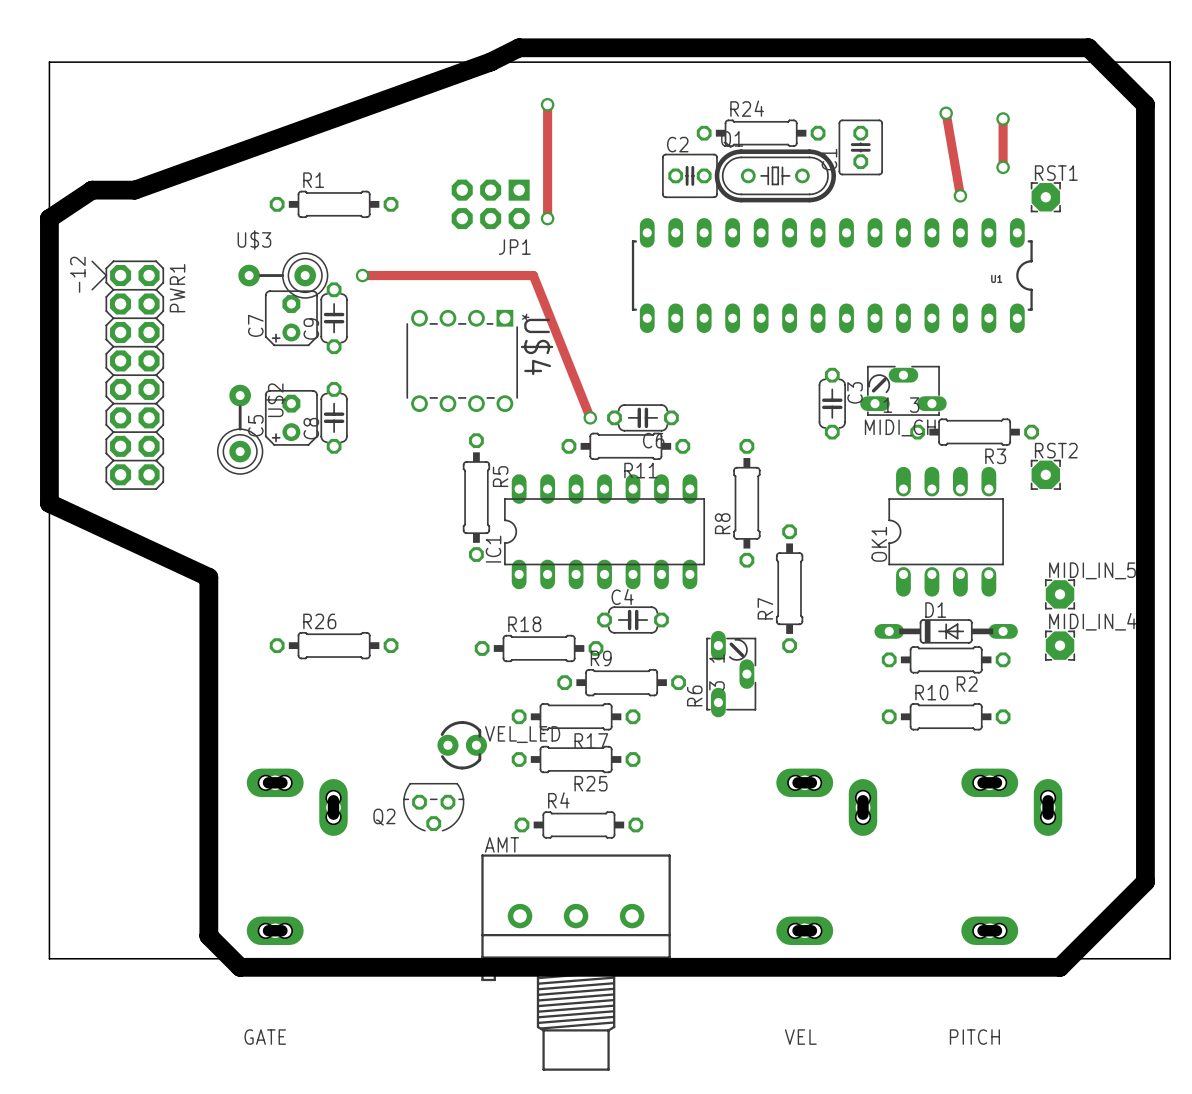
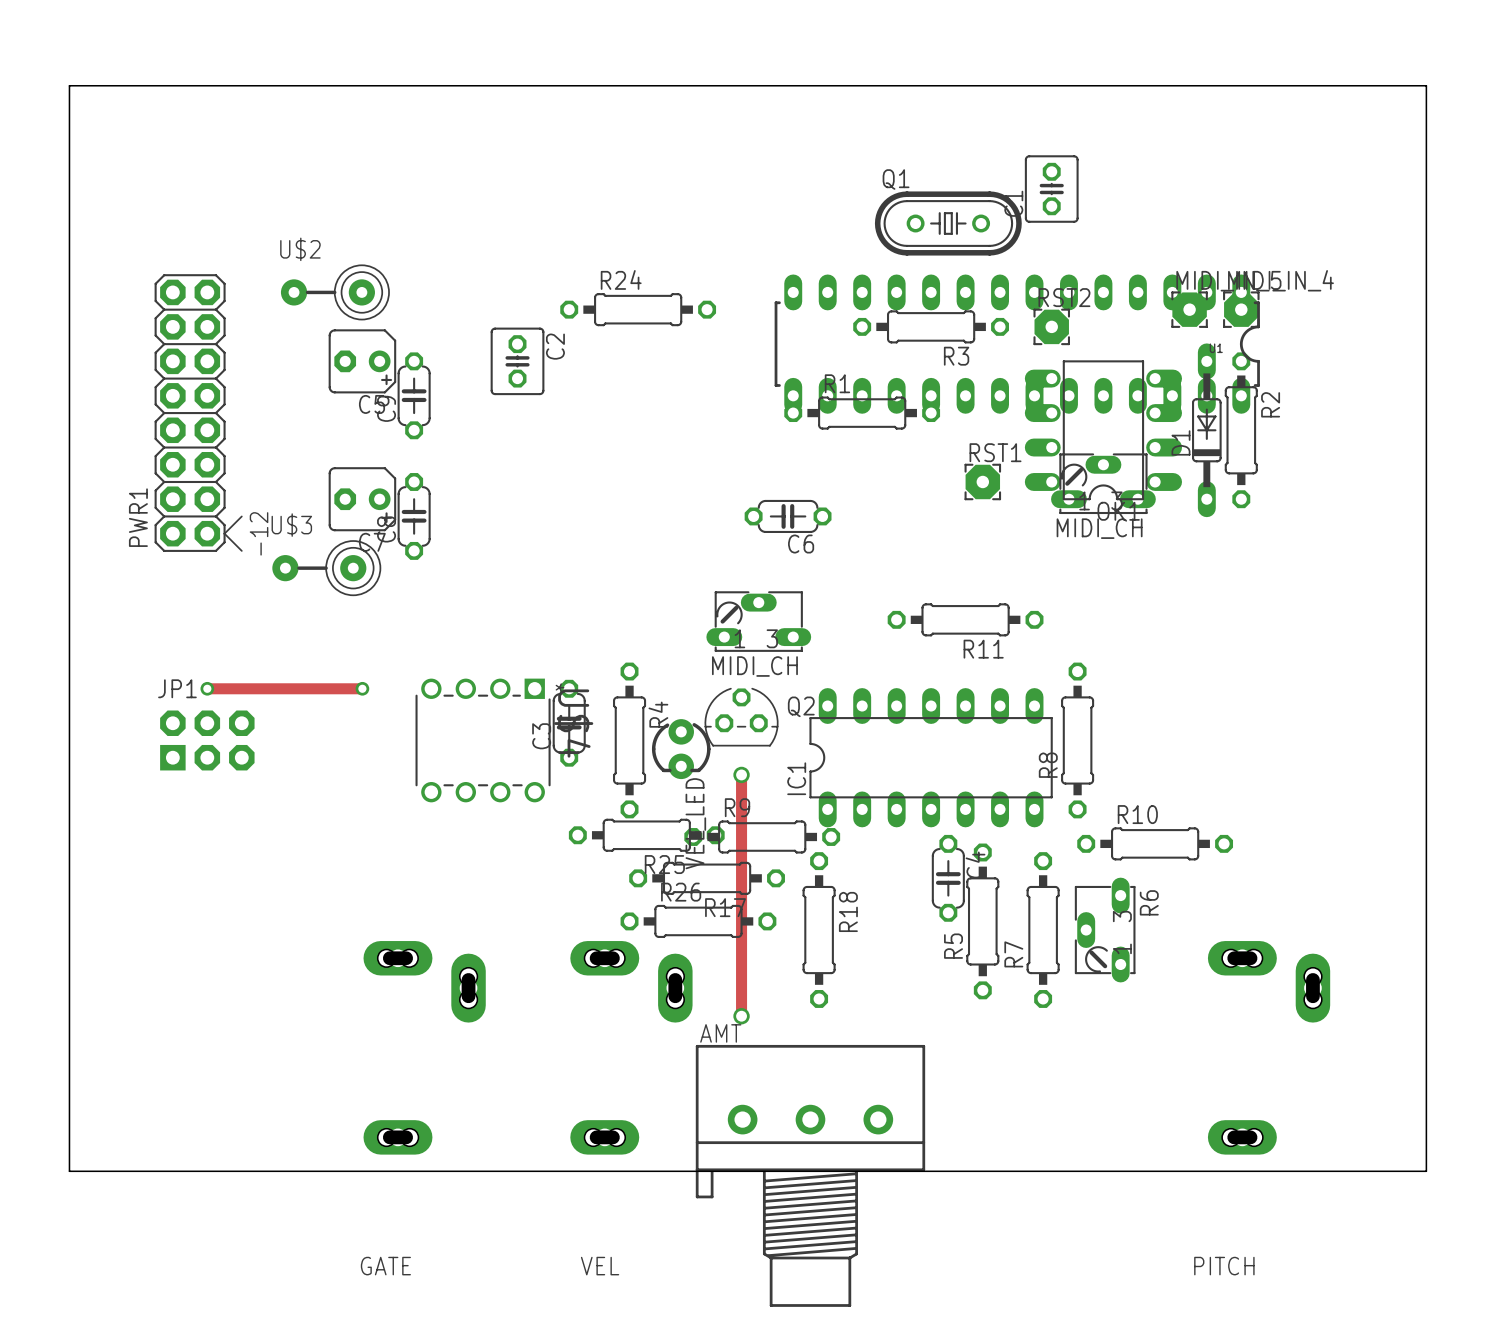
board edge: (519, 47) (490, 62) (134, 190) (92, 190) (49, 218) (49, 503) (208, 577) (208, 936) (240, 967) (1060, 967) (1145, 881) (1145, 104) (1088, 47) (519, 47) -> none
track: (547, 104) (547, 218) -> none
via: (547, 104) -> none
track: (946, 113) (960, 195) -> none
via: (946, 113) -> none
track: (1003, 118) (1003, 167) -> none
via: (1003, 118) -> none
R24 position: (761, 133) -> (638, 309)
via: (1003, 167) -> none
C2 rotation: 0° (689, 175) -> 90° clockwise (517, 361)
C2 position: (689, 175) -> (517, 361)
via: (960, 195) -> none
RST1 position: (1045, 197) -> (982, 481)
R1 position: (334, 204) -> (862, 413)
JP1 rotation: 0° (490, 204) -> 180° (207, 740)
JP1 position: (490, 204) -> (207, 740)
via: (547, 218) -> none
PWR1 footprint: [91, 260, 165, 490] -> [154, 274, 243, 552]
U$3 position: (283, 275) -> (326, 568)
track: (362, 275) (533, 275) (590, 417) -> none
via: (362, 275) -> none
PWR1 name position: PWR1 (177, 288) -> PWR1 (138, 517)
C7 rotation: 0° (291, 318) -> 90° counterclockwise (362, 499)
C7 position: (291, 318) -> (362, 499)
U$4 position: (462, 360) -> (483, 740)
C3 rotation: 0° (832, 403) -> 180° (569, 723)
C3 position: (832, 403) -> (569, 723)
C5 rotation: 0° (291, 417) -> 90° counterclockwise (362, 361)
C5 position: (291, 417) -> (362, 361)
via: (590, 417) -> none
U$2 rotation: 0° (240, 429) -> 90° counterclockwise (335, 292)
U$2 position: (240, 429) -> (335, 292)
R3 position: (974, 432) -> (931, 326)
R11 position: (625, 446) -> (965, 619)
RST2 position: (1045, 474) -> (1051, 326)
R5 name position: R5 (500, 476) -> R5 (953, 946)
R5 position: (476, 497) -> (982, 921)
R8 position: (746, 503) -> (1077, 740)
MIDI_CH: none -> (758, 621)
IC1 position: (604, 531) -> (931, 757)
OK1 rotation: 0° (946, 531) -> 90° counterclockwise (1103, 430)
OK1 position: (946, 531) -> (1103, 430)
track: none -> (207, 688) (362, 688)
via: none -> (207, 688)
via: none -> (362, 688)
R7 position: (789, 588) -> (1043, 930)
MIDI_IN_5 position: (1060, 594) -> (1189, 309)
C4 rotation: 0° (633, 620) -> 90° clockwise (948, 878)
C4 position: (633, 620) -> (948, 878)
R6 footprint: [706, 630, 757, 718] -> [1074, 877, 1136, 983]
track: none -> (741, 774) (741, 1016)
via: none -> (741, 774)
D1 rotation: 0° (946, 631) -> 90° counterclockwise (1206, 430)
D1 position: (946, 631) -> (1206, 430)
R26 position: (334, 645) -> (698, 921)
MIDI_IN_4 position: (1060, 645) -> (1241, 309)
R18 rotation: 0° (539, 648) -> 90° clockwise (819, 930)
R18 position: (539, 648) -> (819, 930)
R2 rotation: 0° (946, 659) -> 90° clockwise (1241, 430)
R2 position: (946, 659) -> (1241, 430)
R2 name position: R2 (967, 684) -> R2 (1270, 404)
R6 name position: R6 (694, 695) -> R6 (1149, 902)
R10 position: (946, 716) -> (1155, 843)
VEL_LED rotation: 0° (462, 745) -> 90° clockwise (681, 749)
VEL_LED position: (462, 745) -> (681, 749)
R25 position: (576, 759) -> (646, 835)
Q2 rotation: 0° (433, 807) -> 180° (741, 717)
Q2 position: (433, 807) -> (741, 717)
R4 rotation: 0° (578, 824) -> 90° clockwise (629, 740)
R4 position: (578, 824) -> (629, 740)
via: none -> (741, 1016)
GATE position: (297, 856) -> (424, 1047)
VEL: none -> (631, 1047)
VEL: (826, 856) -> none
PITCH position: (1011, 856) -> (1269, 1047)
AMT position: (576, 962) -> (810, 1175)

